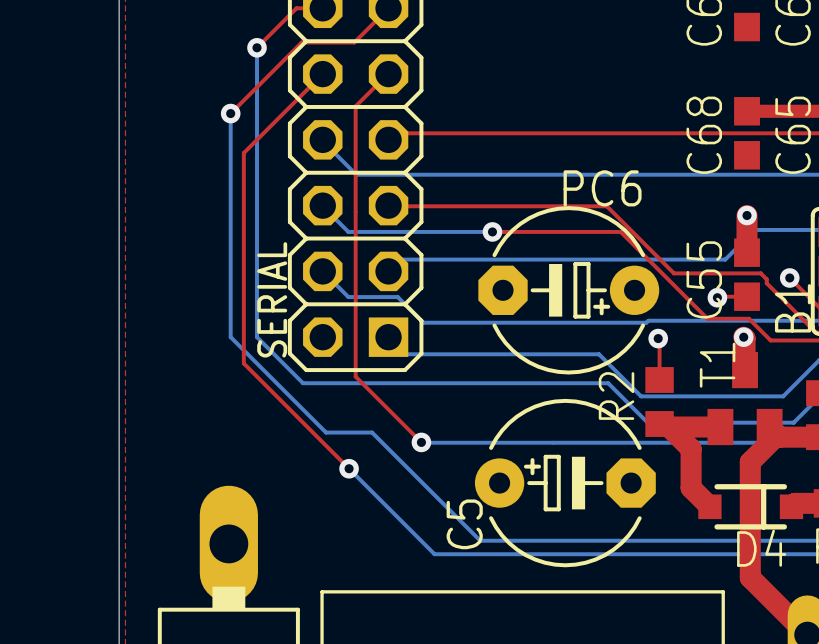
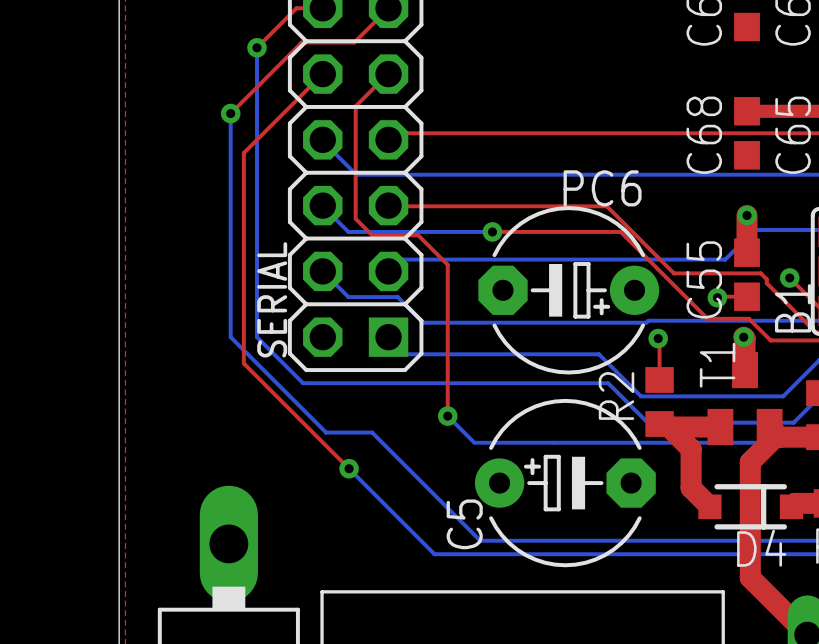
top track: (355, 218) (355, 376) (421, 442) -> (355, 218) (372, 235) (418, 235) (447, 264) (447, 416)
bottom track: (421, 442) (474, 442) -> (447, 416) (474, 442)
via position: (421, 442) -> (447, 416)

